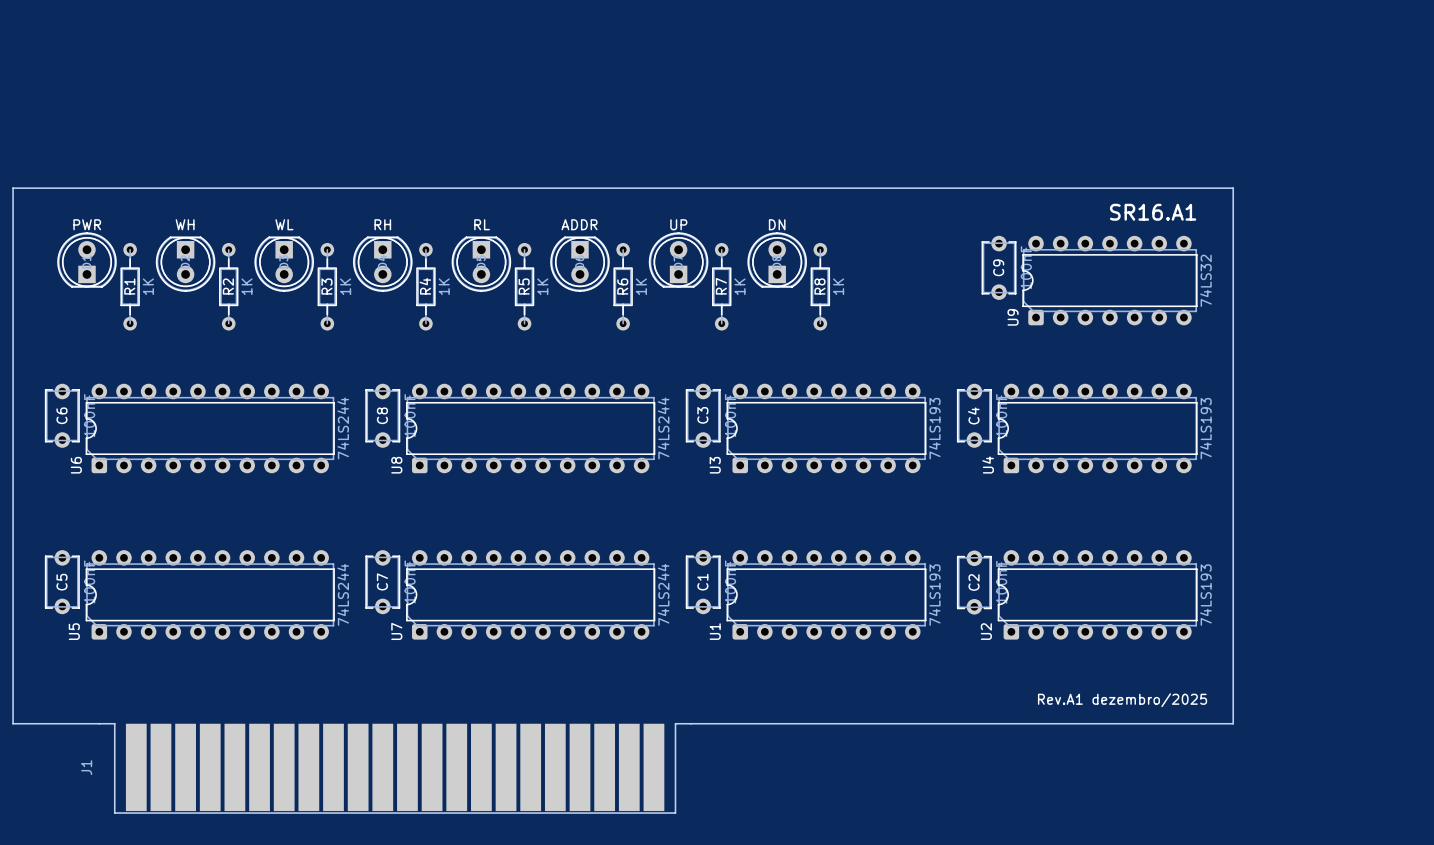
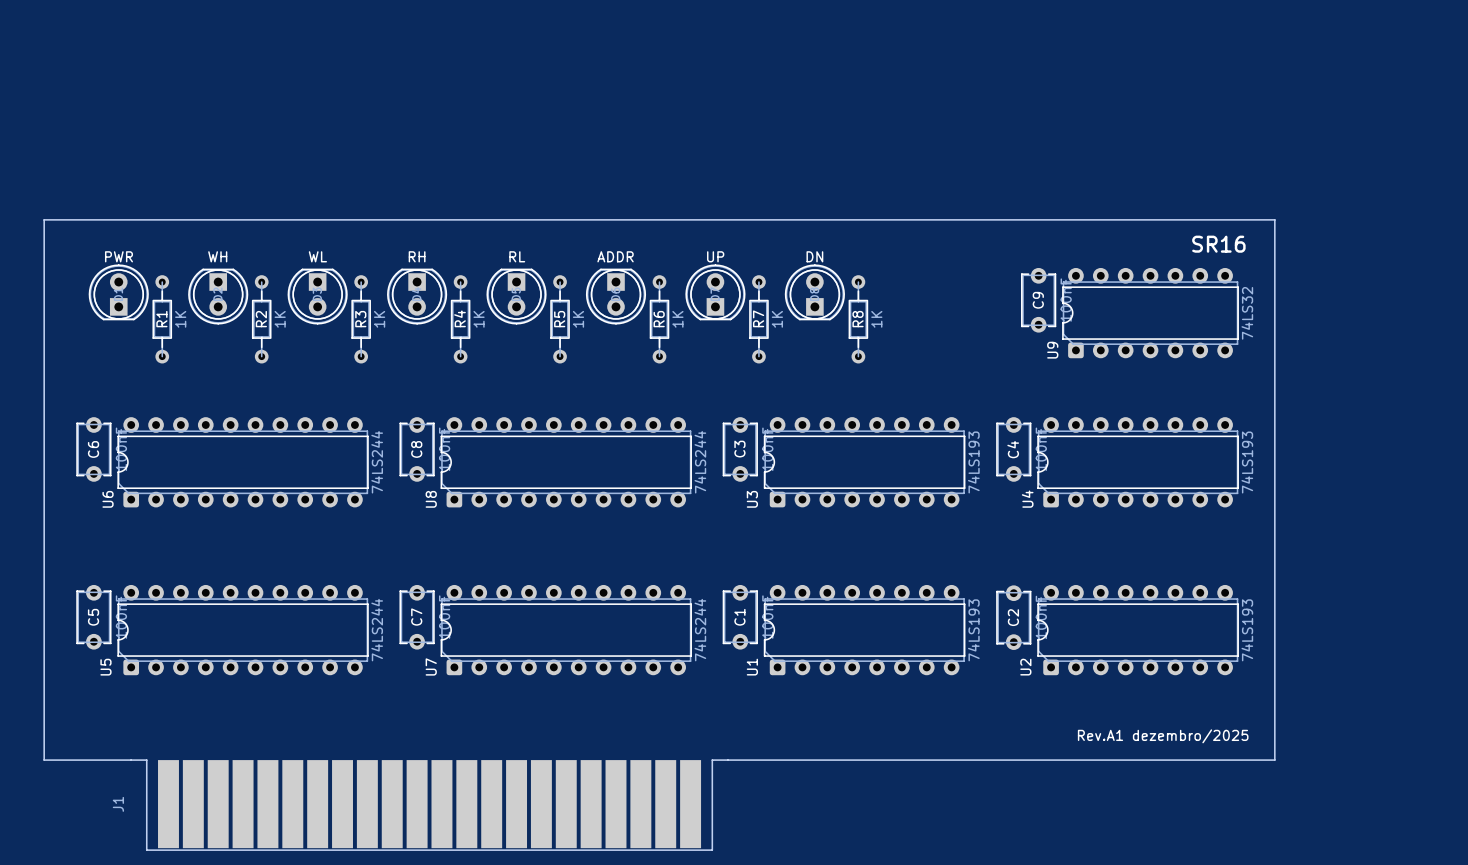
text: SR16.A1 (1153, 212) -> SR16 (1218, 244)

